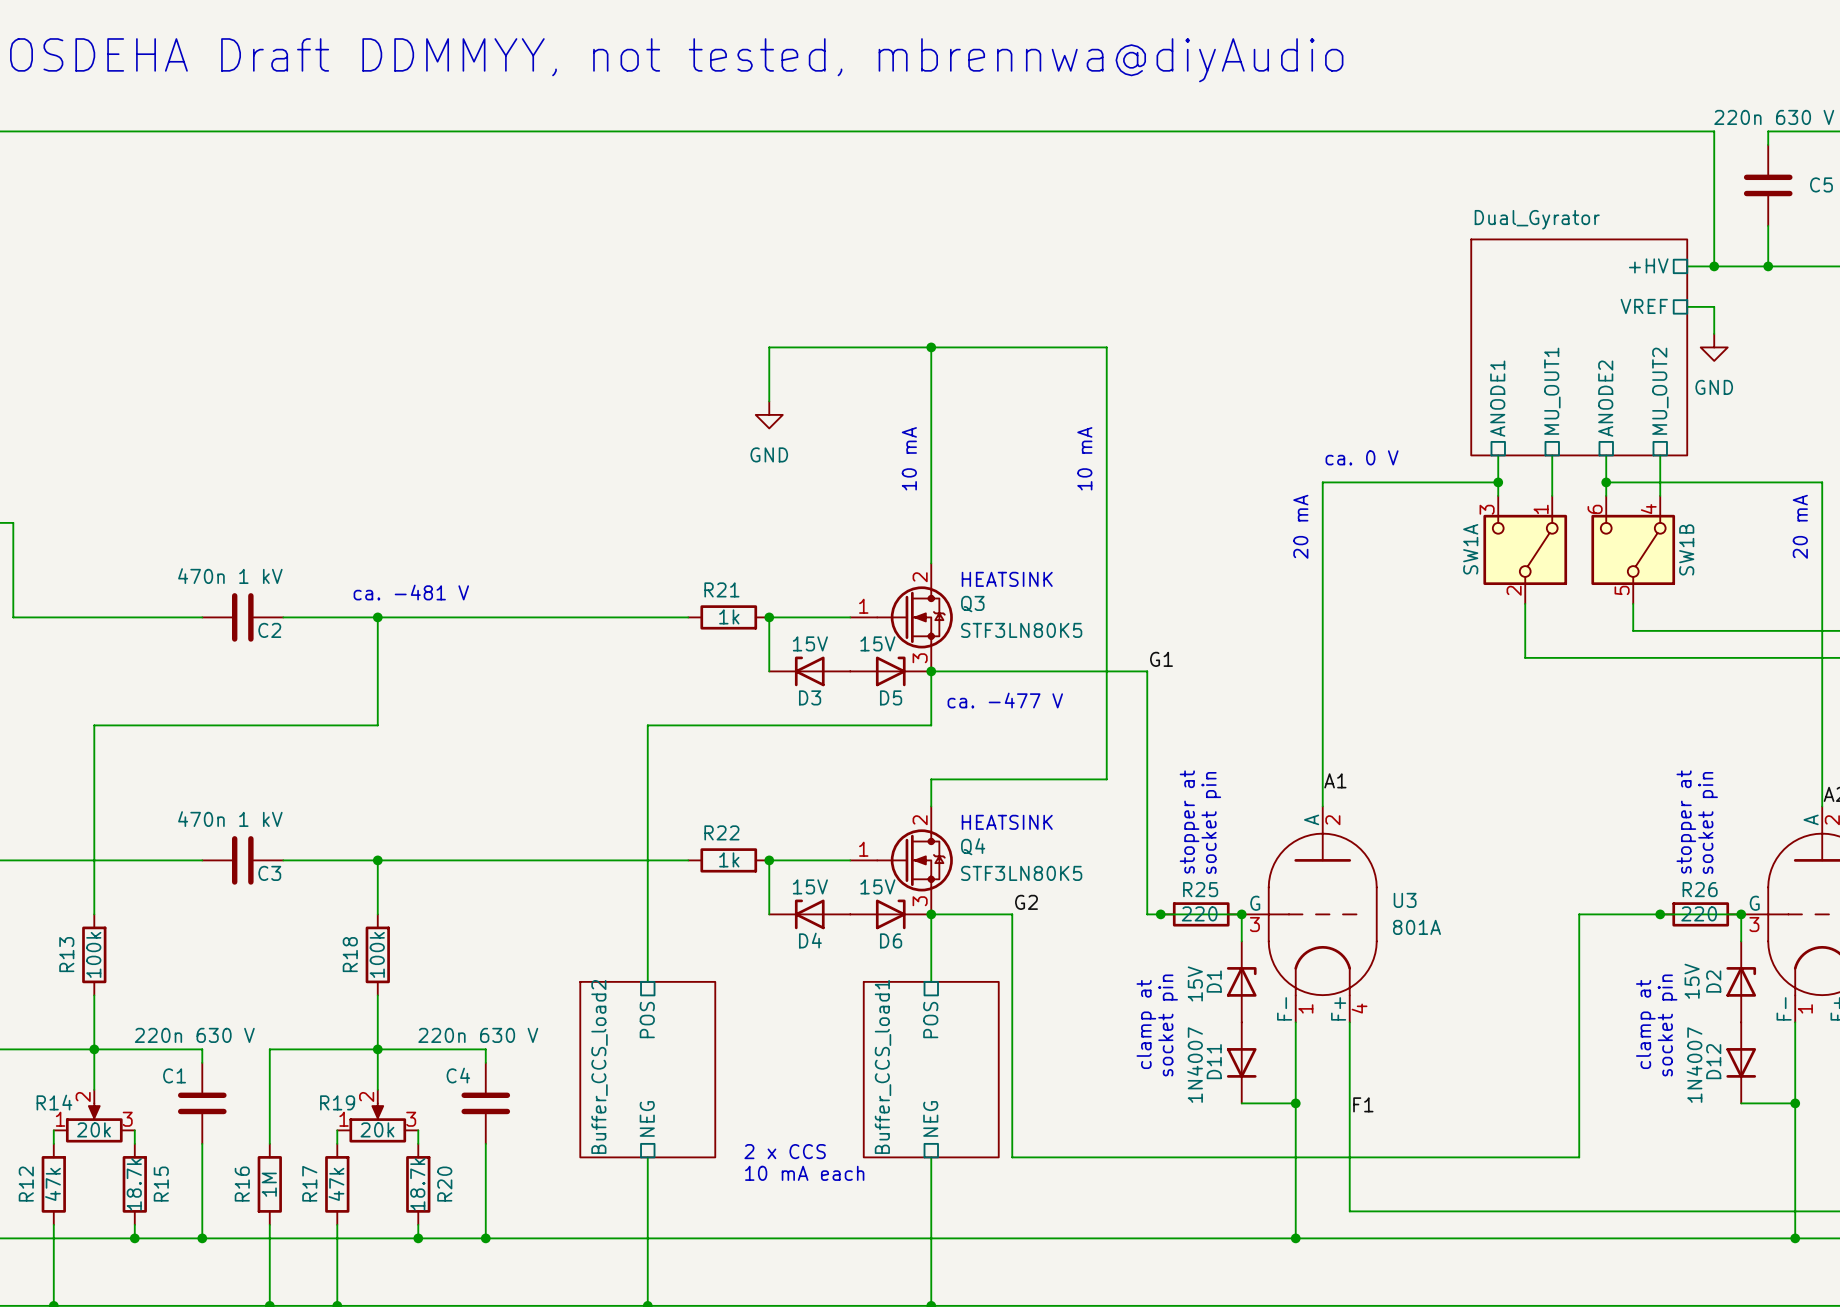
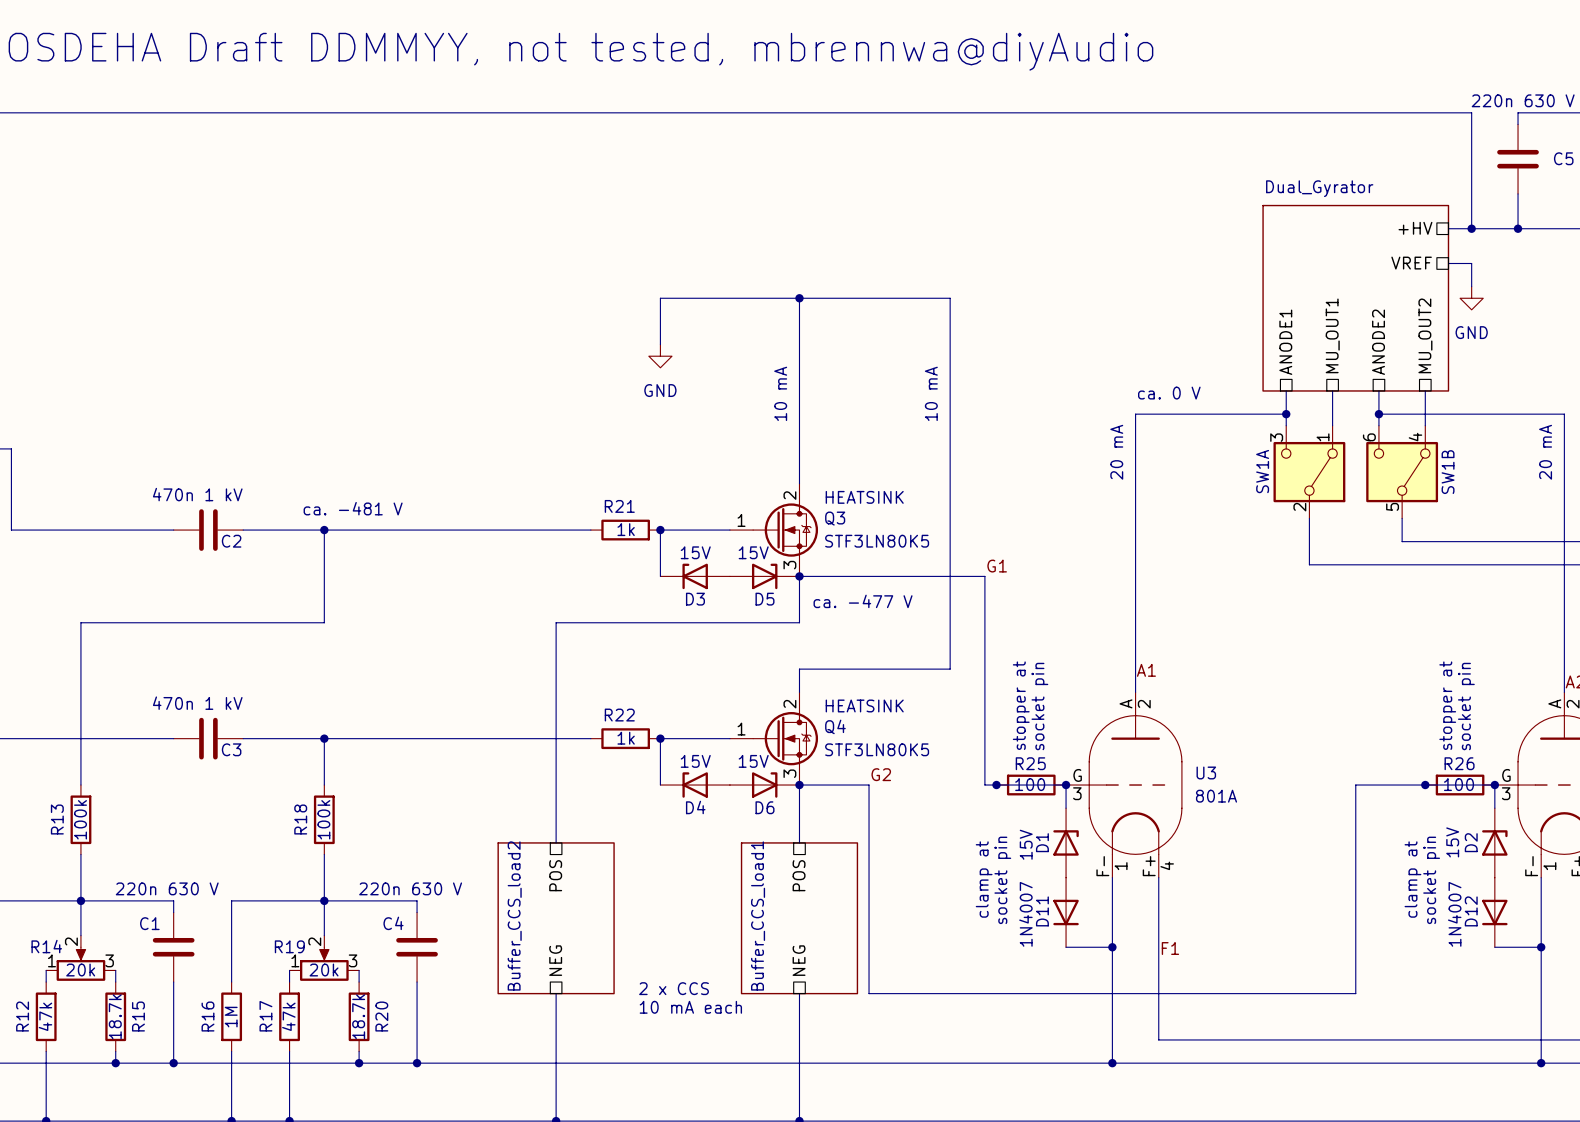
R25 value: 220 (1199, 913) -> 100 (1030, 784)
R26 value: 220 (1699, 913) -> 100 (1459, 784)

